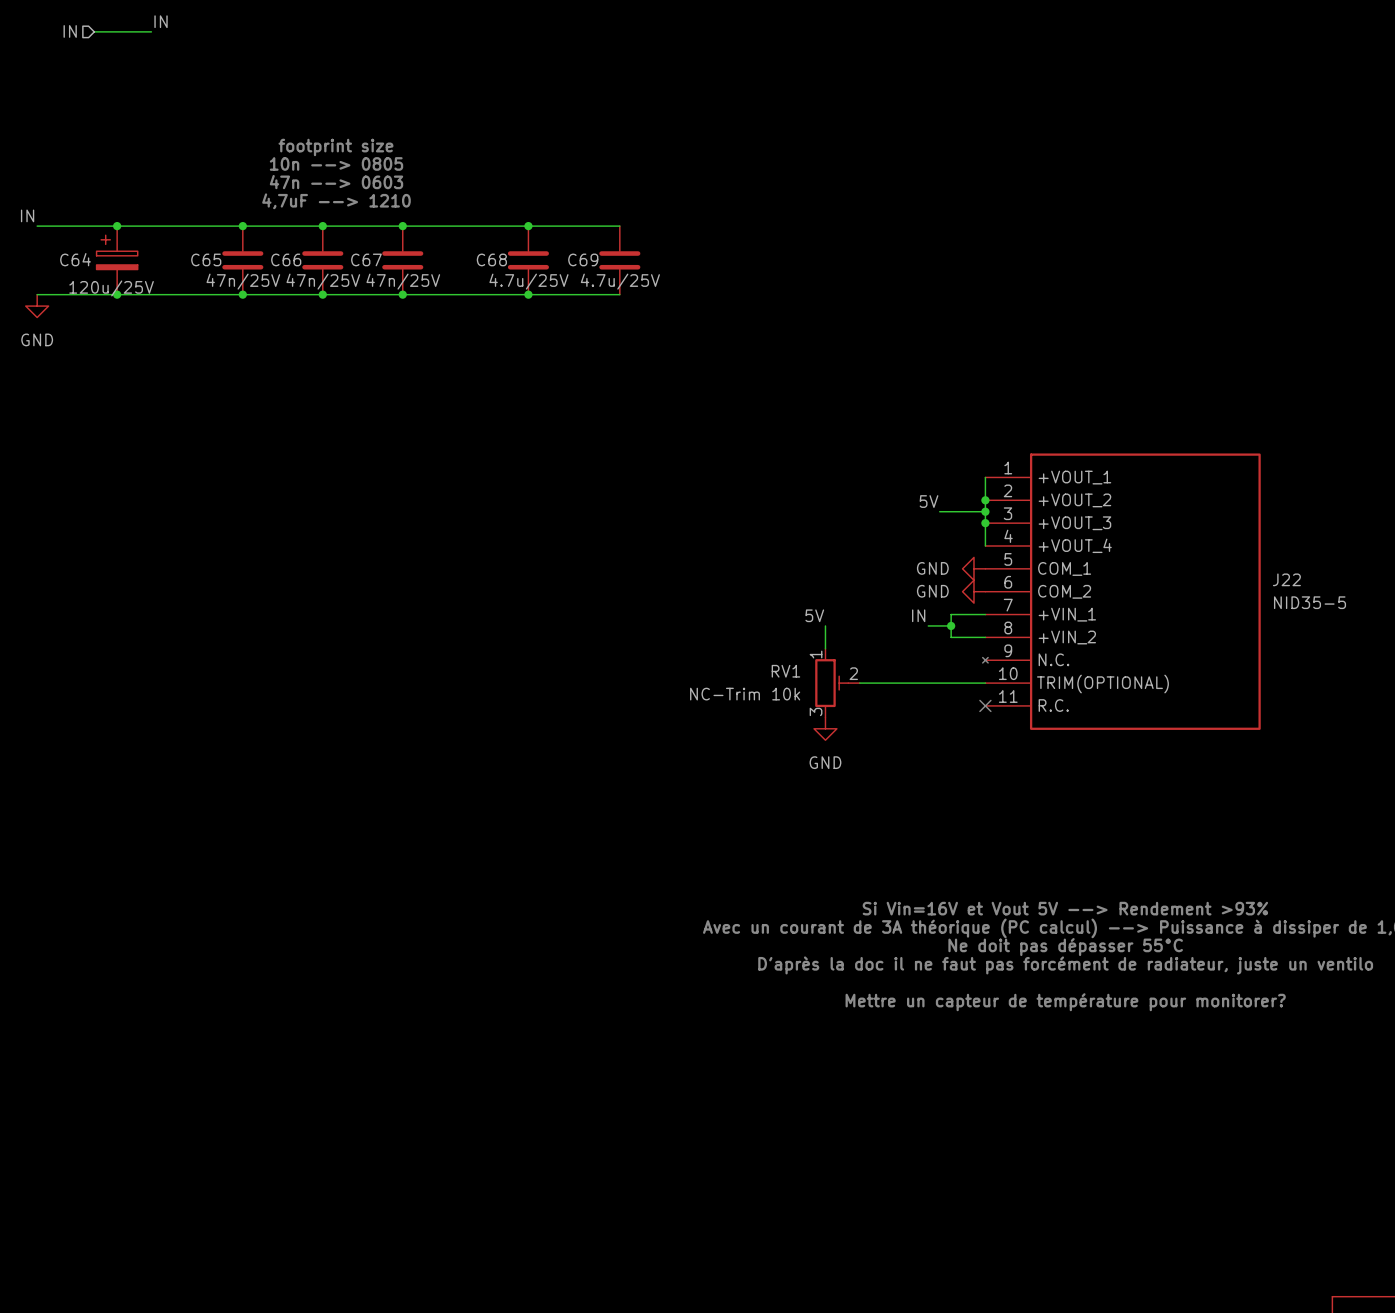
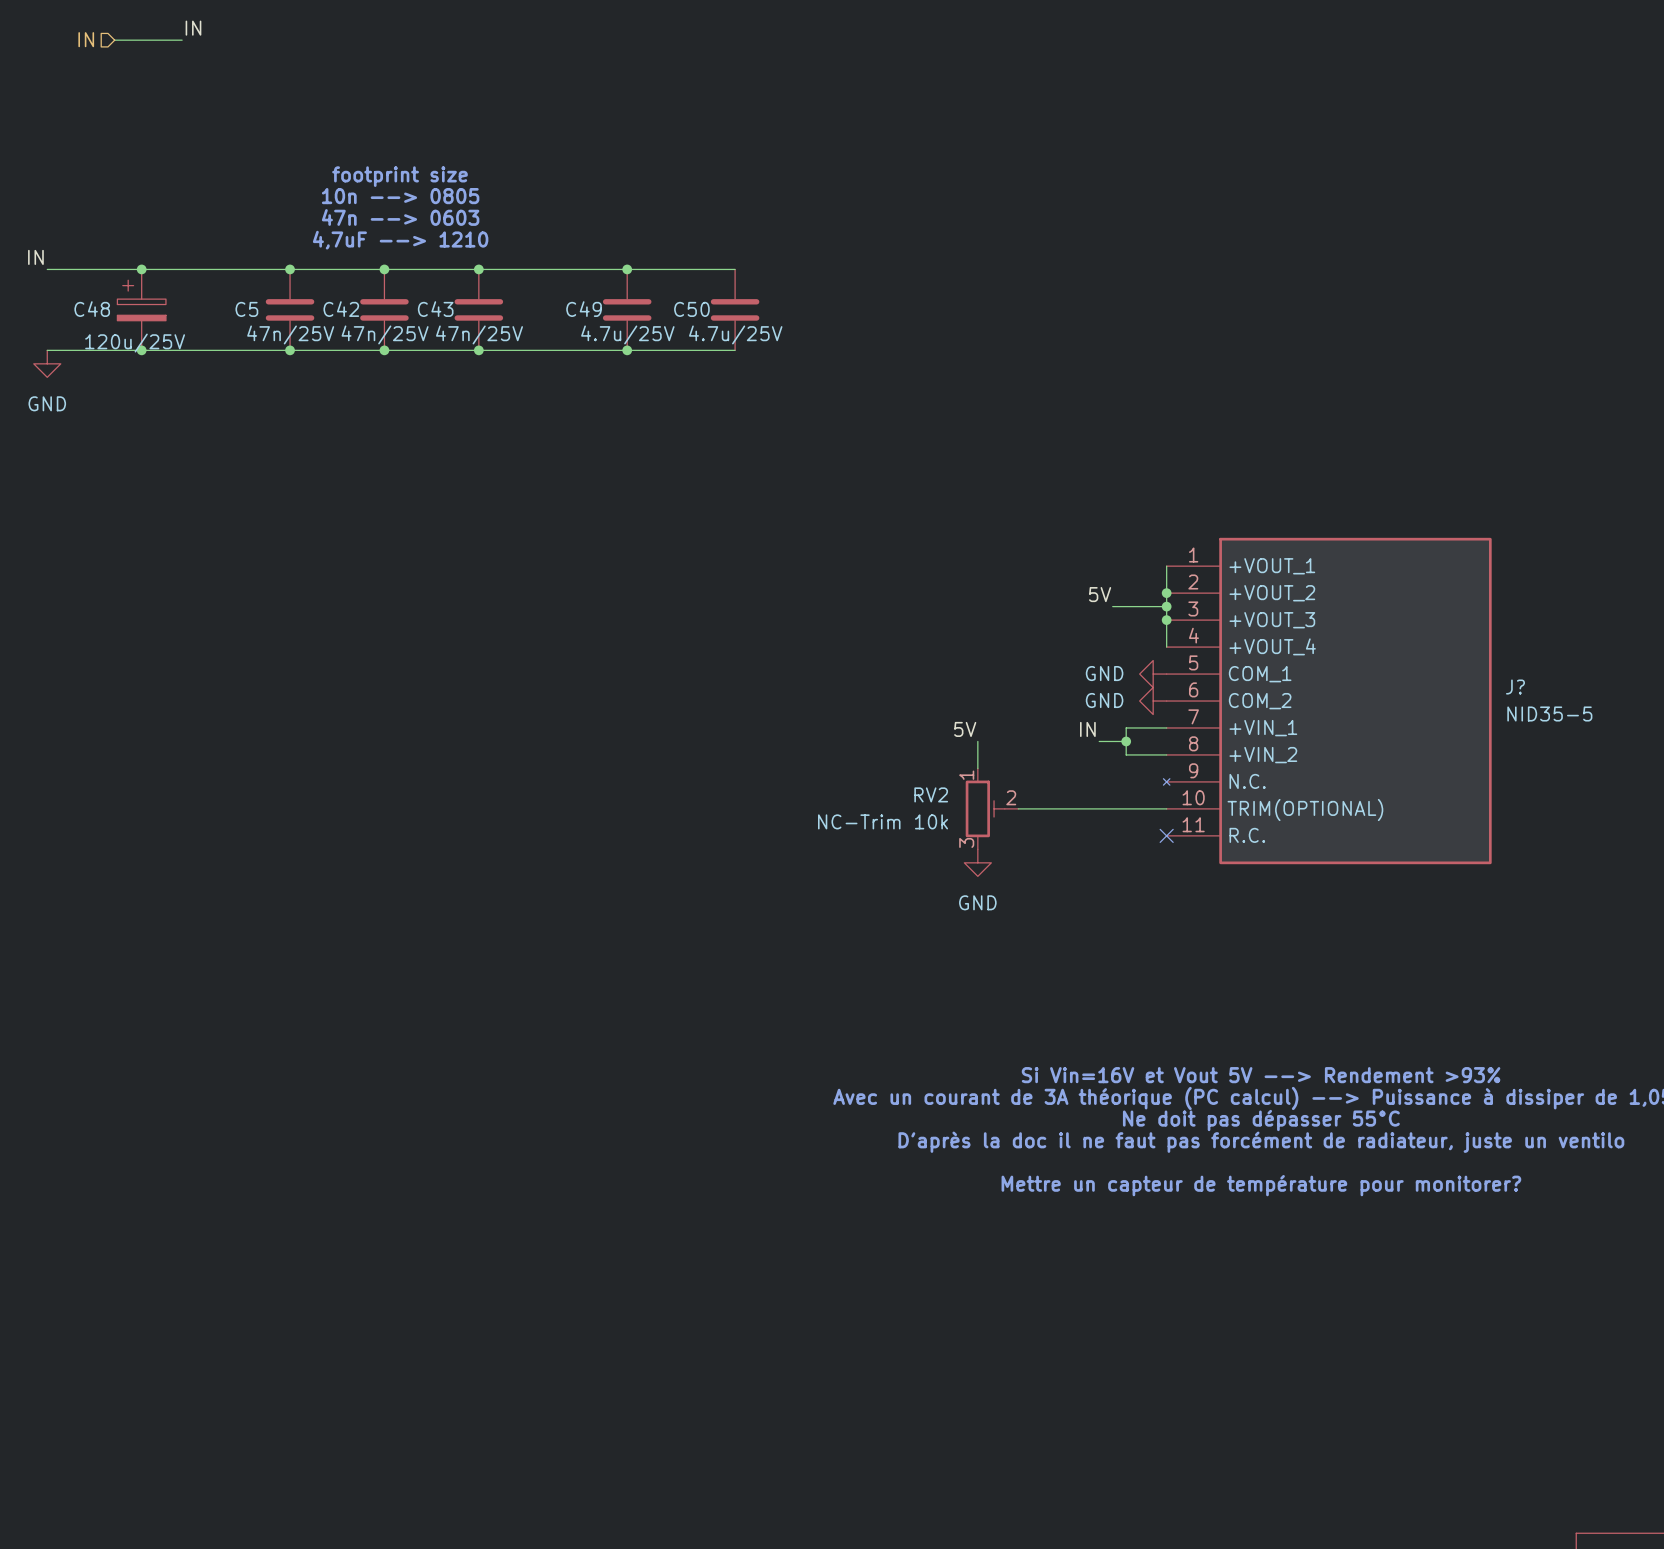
C64 name: C64 (75, 259) -> C48 (92, 309)
C65 name: C65 (206, 259) -> C5 (246, 309)
C66 name: C66 (286, 259) -> C42 (341, 309)
C67 name: C67 (366, 259) -> C43 (435, 309)
C68 name: C68 (491, 259) -> C49 (584, 309)
C69 name: C69 (583, 259) -> C50 (691, 309)
J22 name: J22 (1286, 579) -> J? (1515, 687)
RV1 name: RV1 (785, 671) -> RV2 (931, 794)

